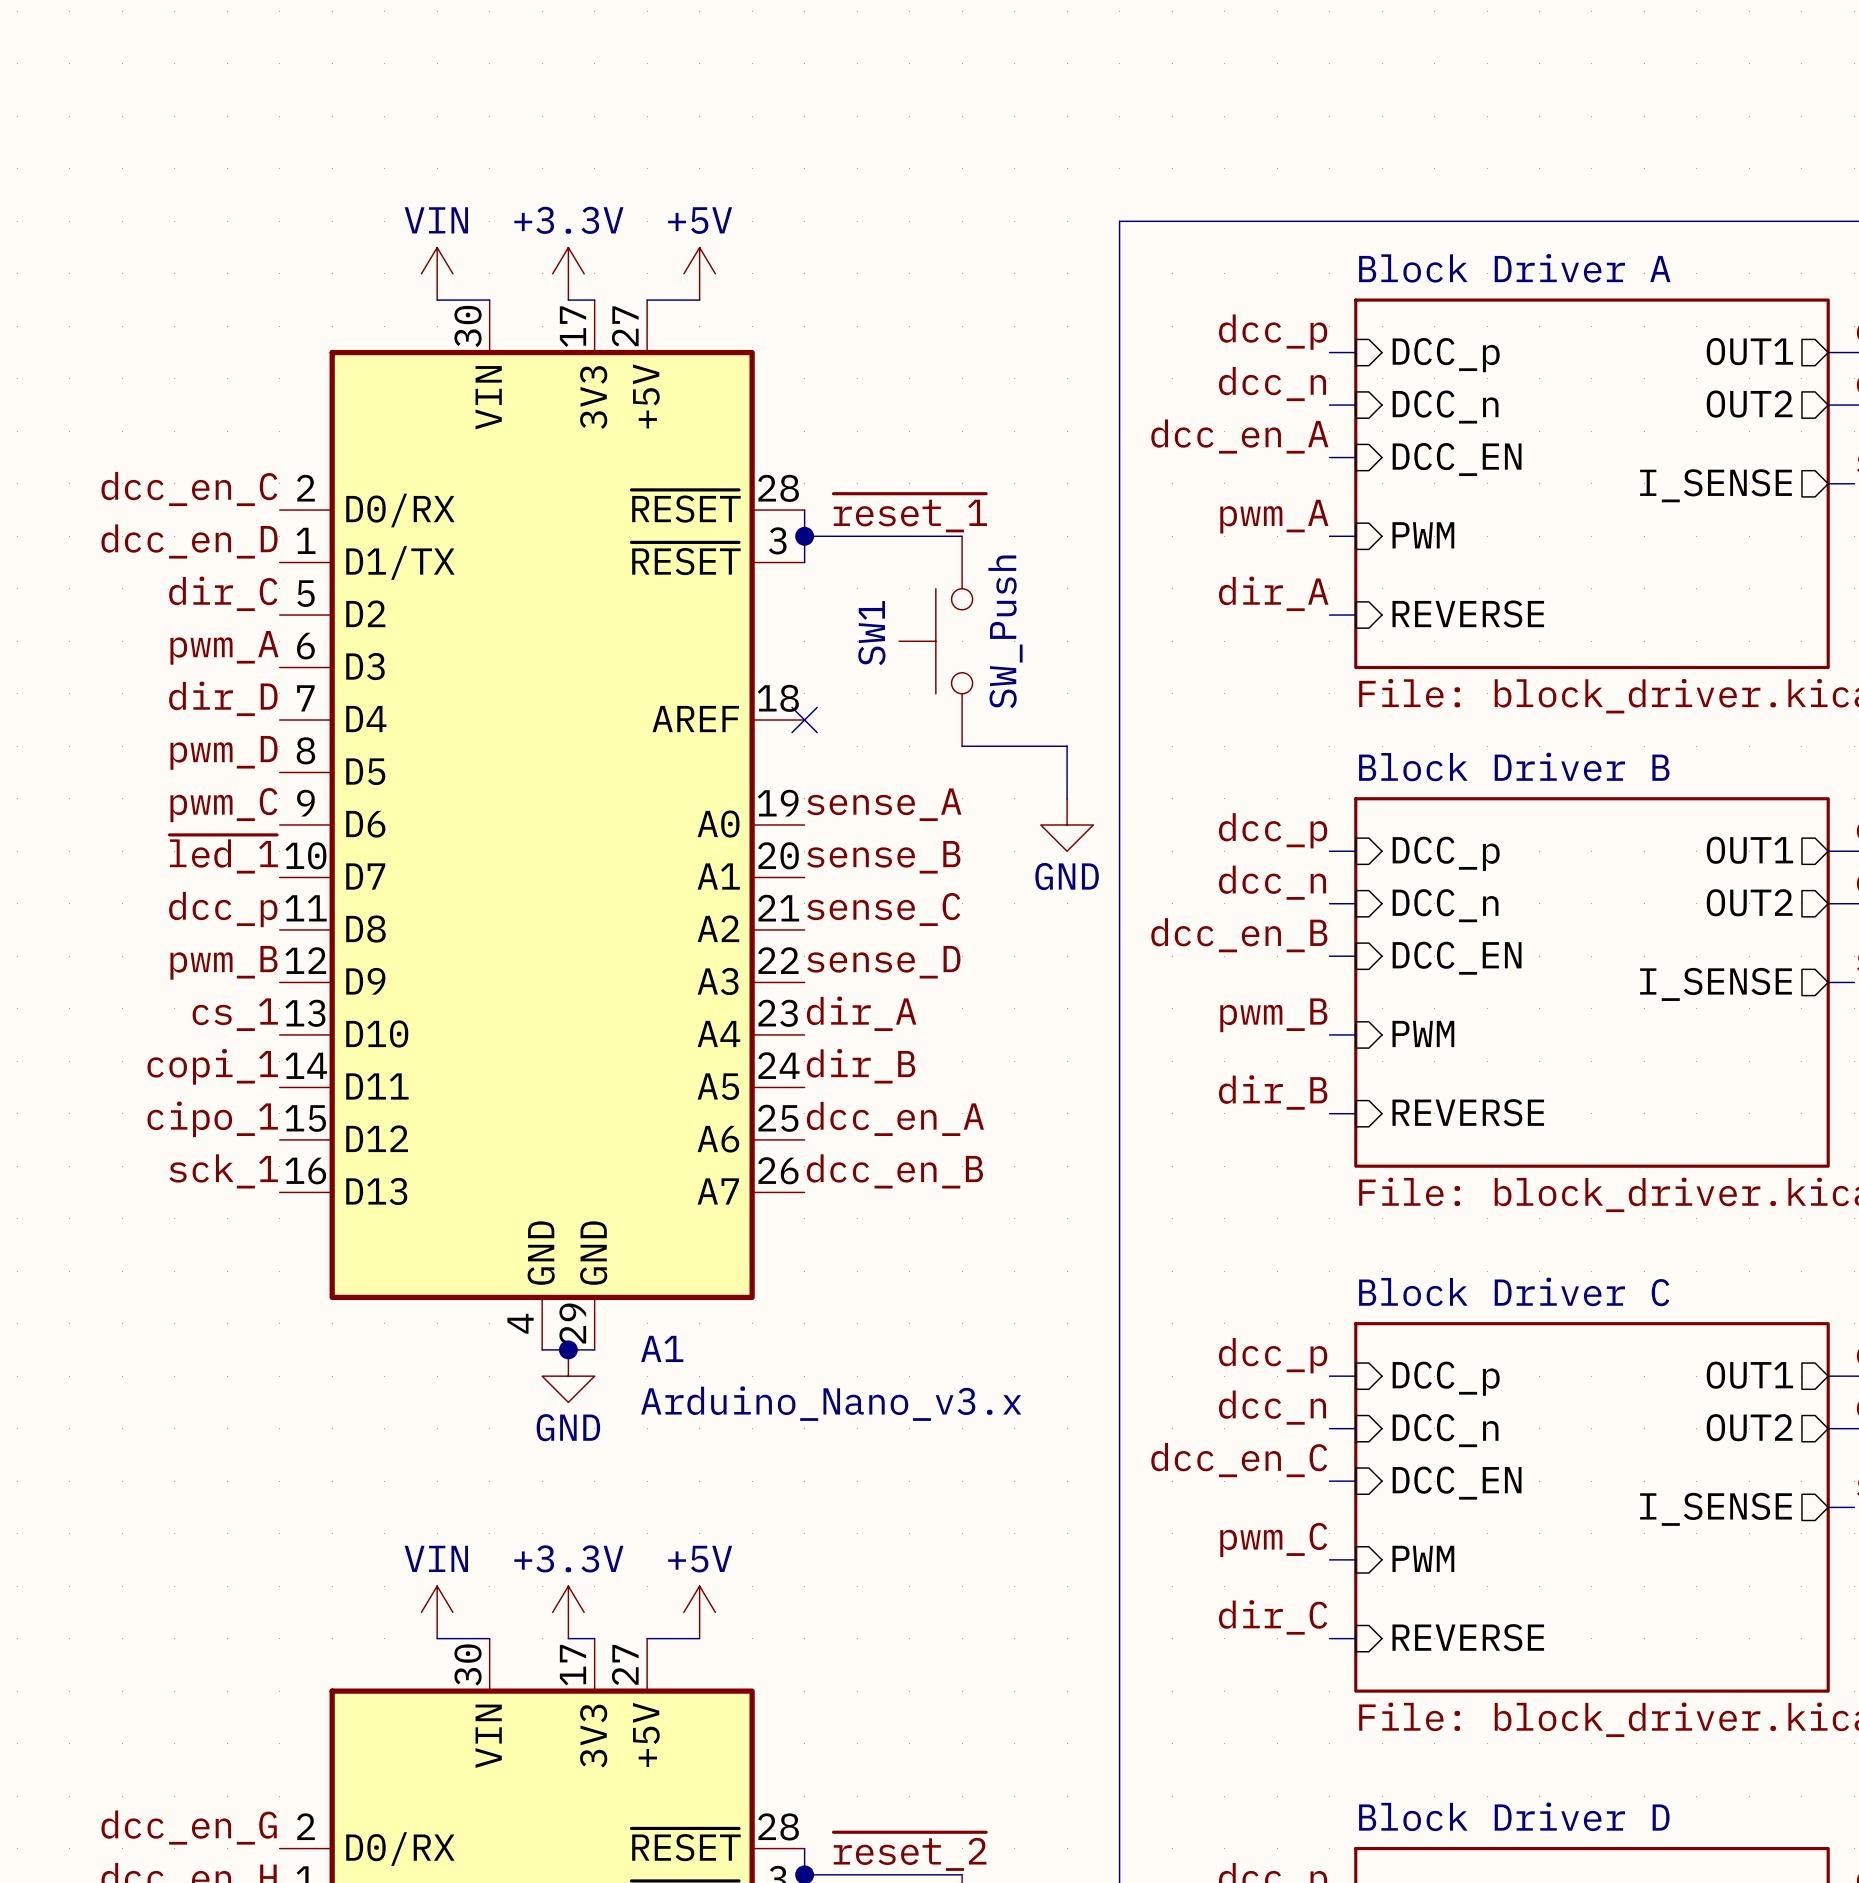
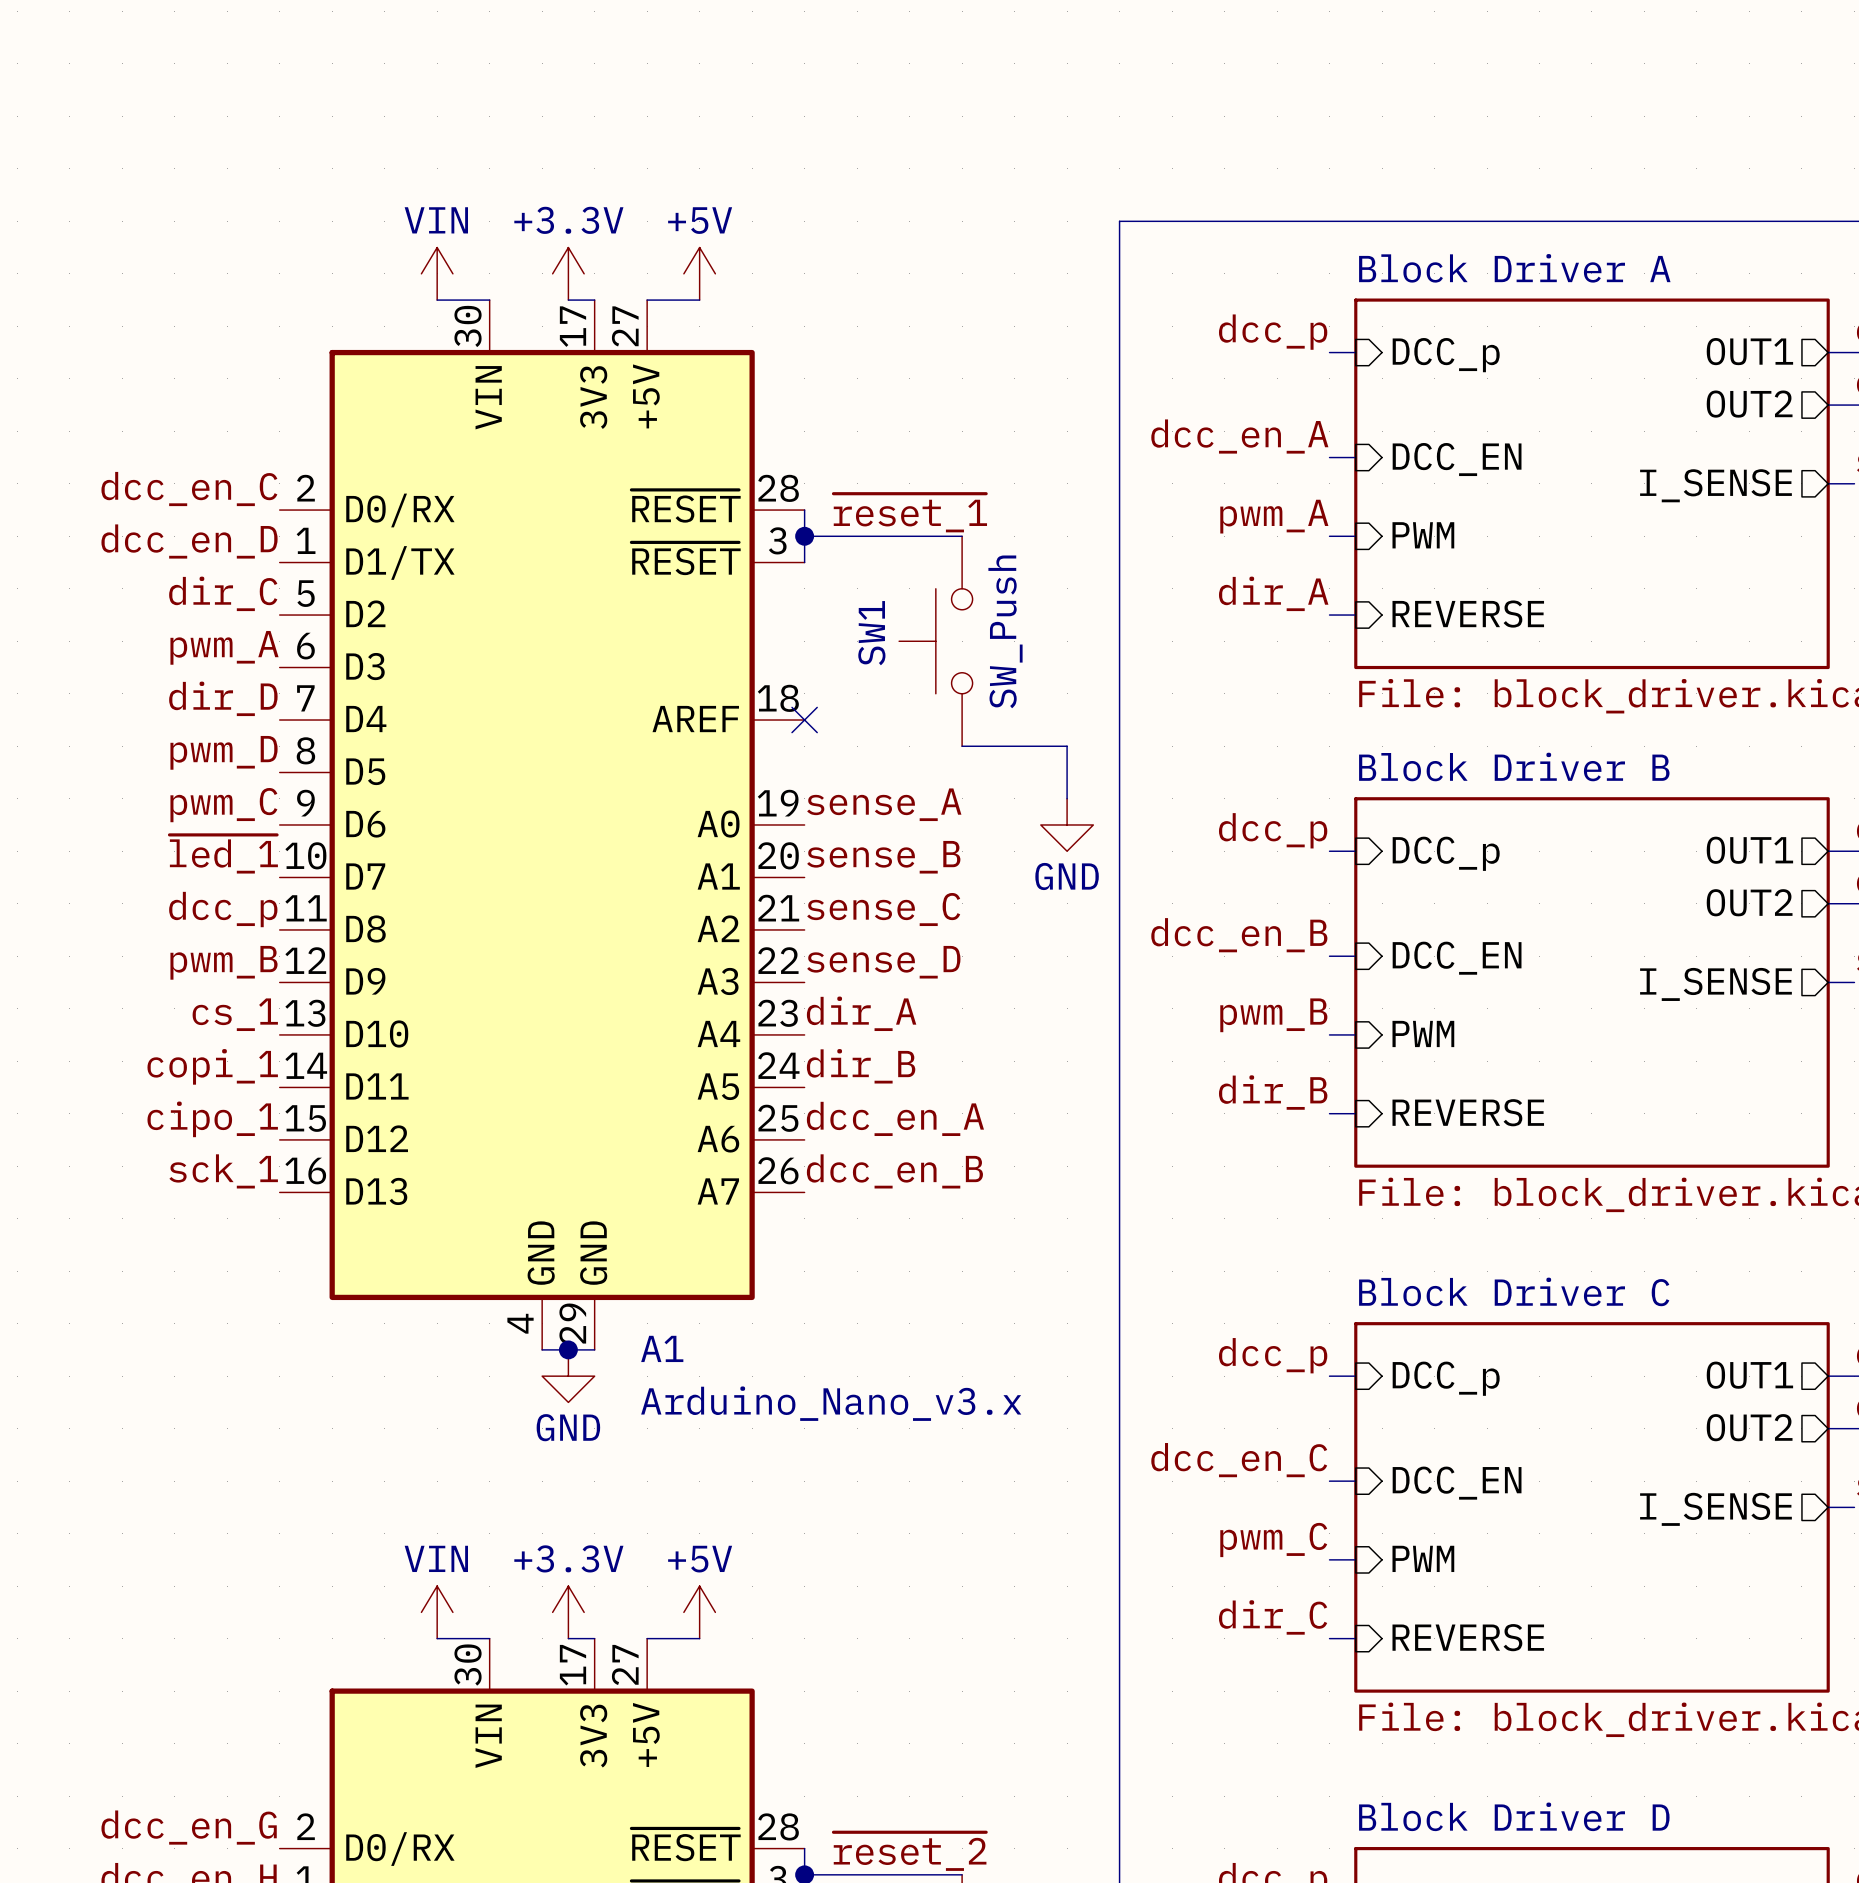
label: dcc_n (1272, 384) -> none
wire: (1329, 405) (1355, 405) -> none
sheet pin: DCC_n (1445, 407) -> none
label: dcc_n (1272, 882) -> none
wire: (1329, 903) (1355, 903) -> none
sheet pin: DCC_n (1445, 905) -> none
label: dcc_n (1272, 1407) -> none
wire: (1329, 1428) (1355, 1428) -> none
sheet pin: DCC_n (1445, 1430) -> none

